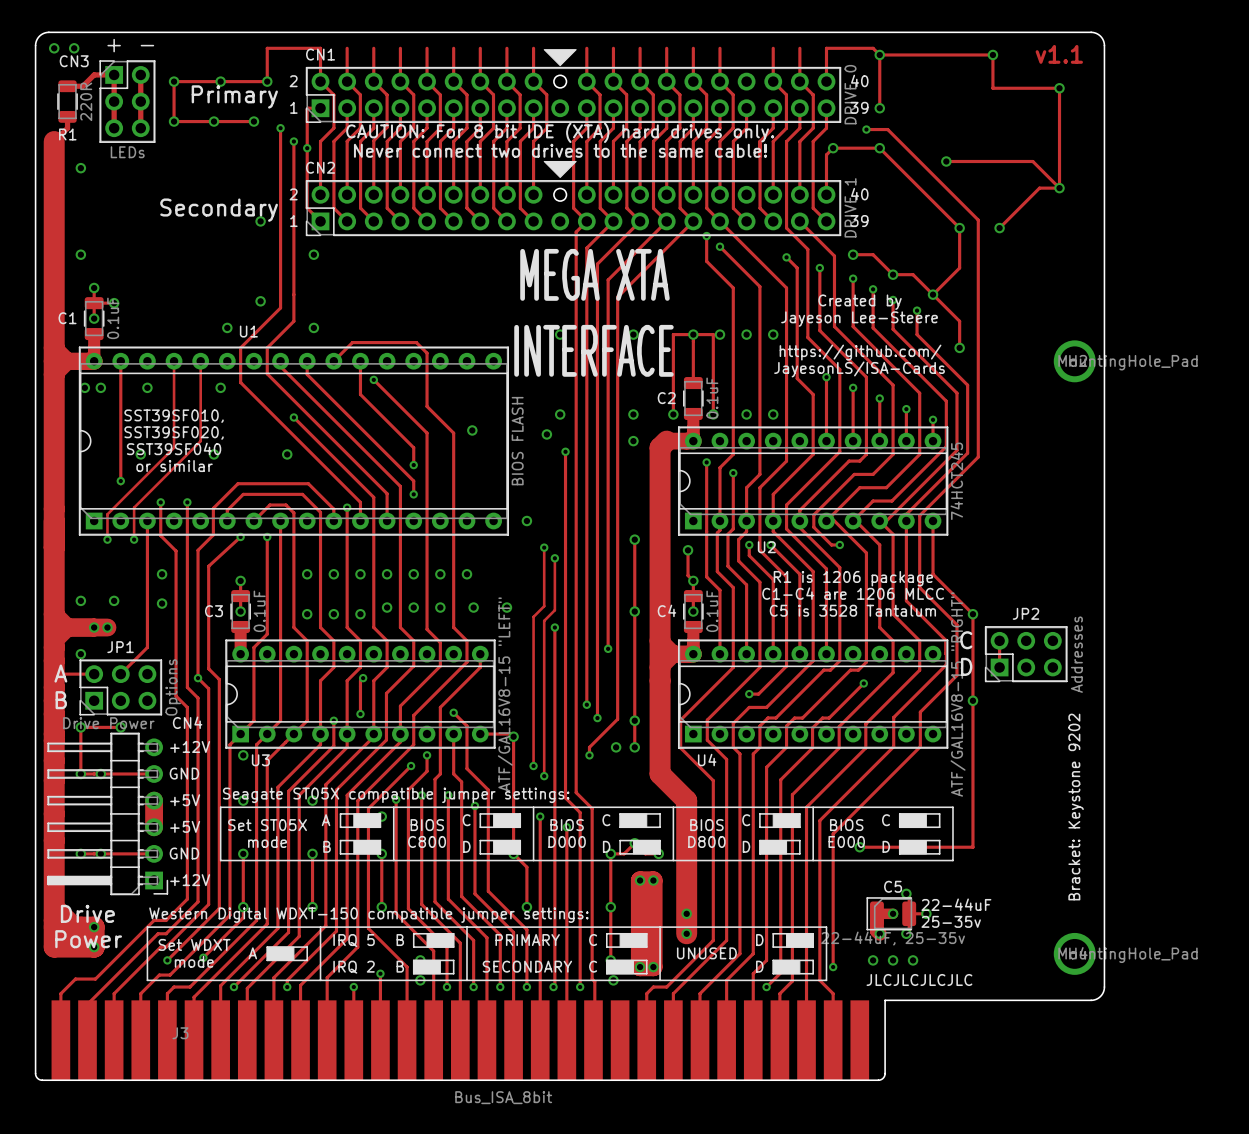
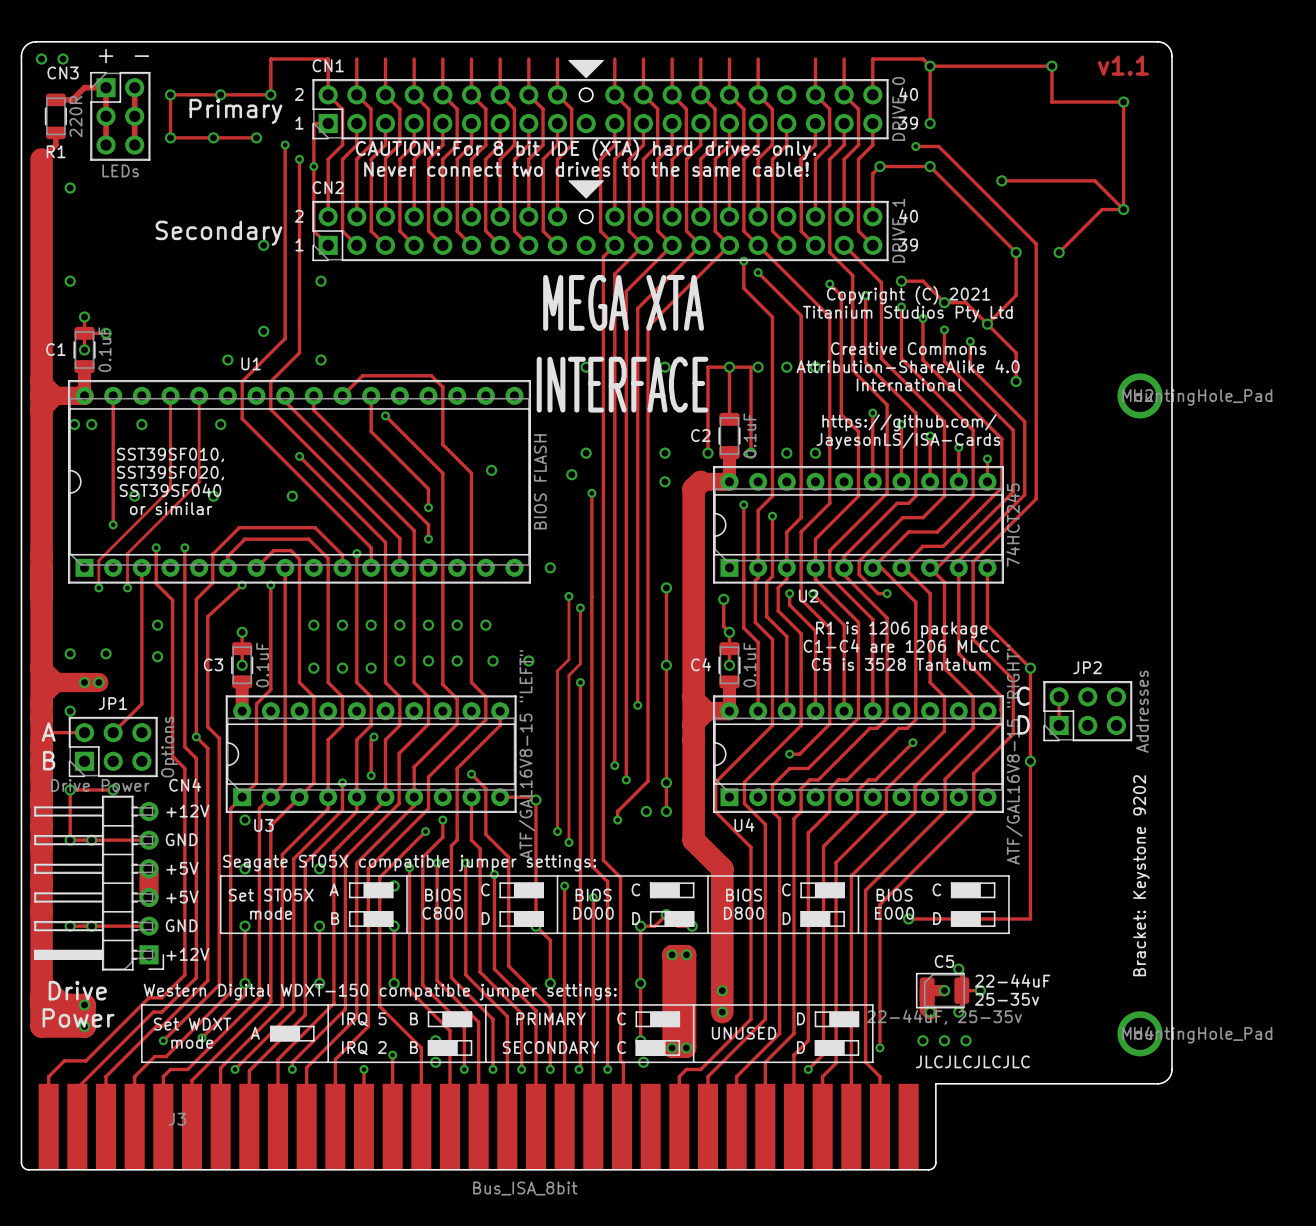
text: none -> Copyright (C) 2021 (908, 295)
text: none -> Titanium Studios Pty Ltd (907, 314)
text: Created by (860, 302) -> none
text: Jayeson Lee-Steere (859, 319) -> Creative Commons (908, 348)
text: none -> Attribution-ShareAlike 4.0 (908, 366)
text: https://github.com/ (860, 352) -> International (909, 384)
text position: JayesonLS/ISA-Cards (859, 369) -> JayesonLS/ISA-Cards (908, 441)
text: none -> https://github.com/ (909, 422)

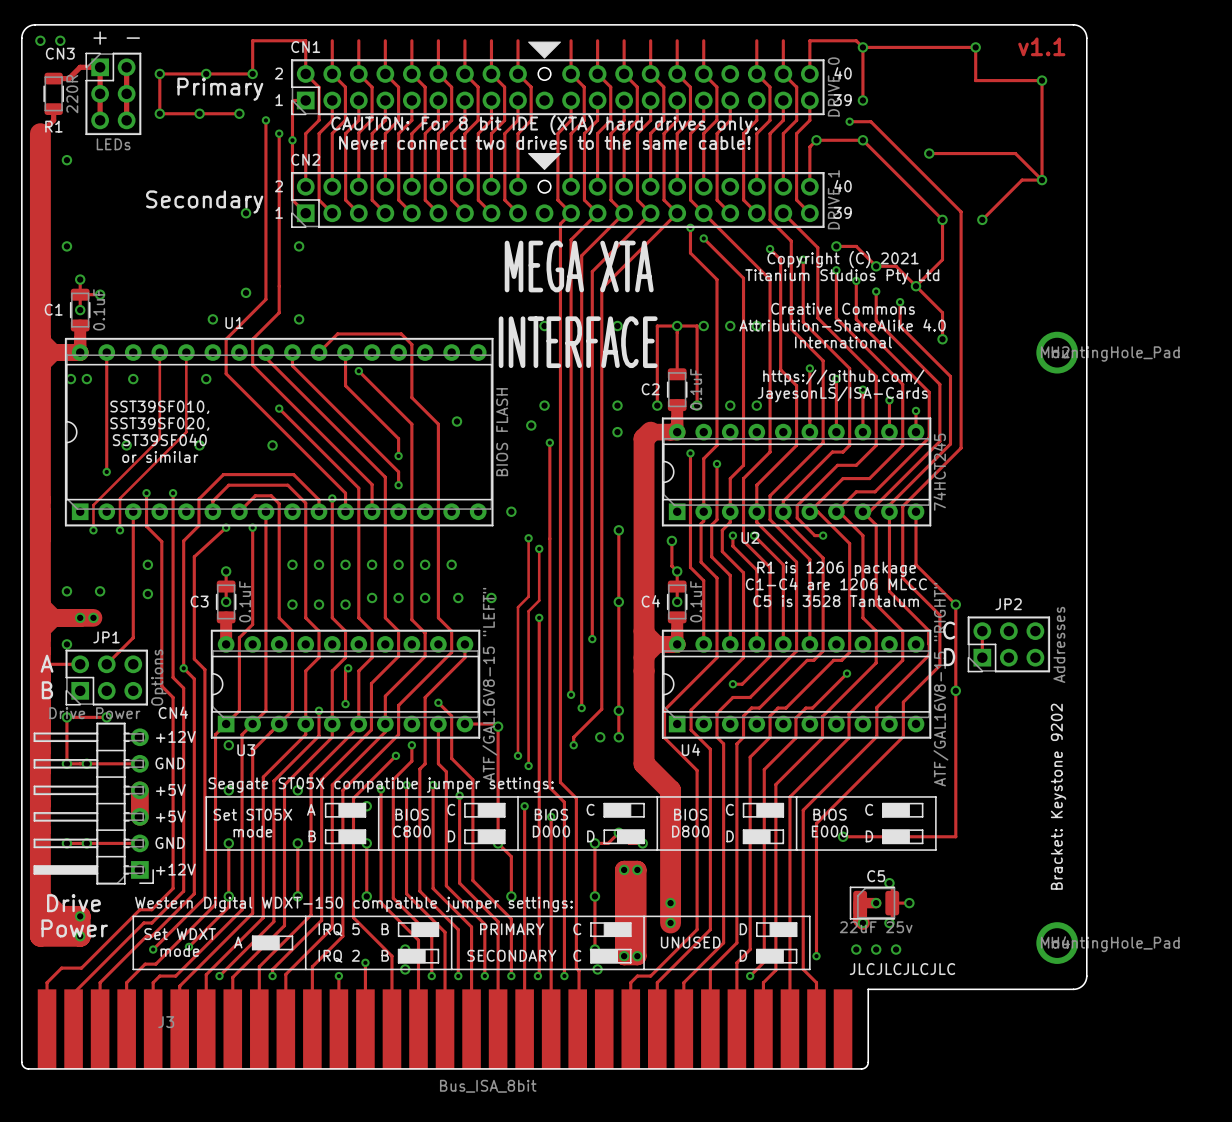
text: 22-44uF (1012, 980) -> none
text: 25-35v (1007, 999) -> none
C5 value: 22-44uF, 25-35v (944, 1017) -> 22uF 25v (876, 927)

